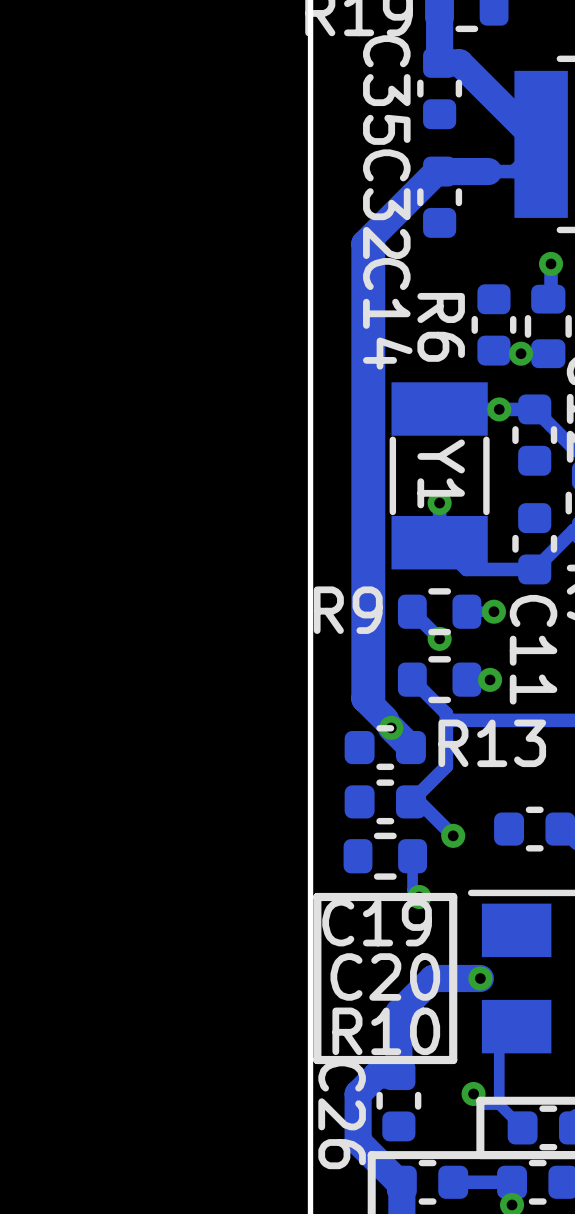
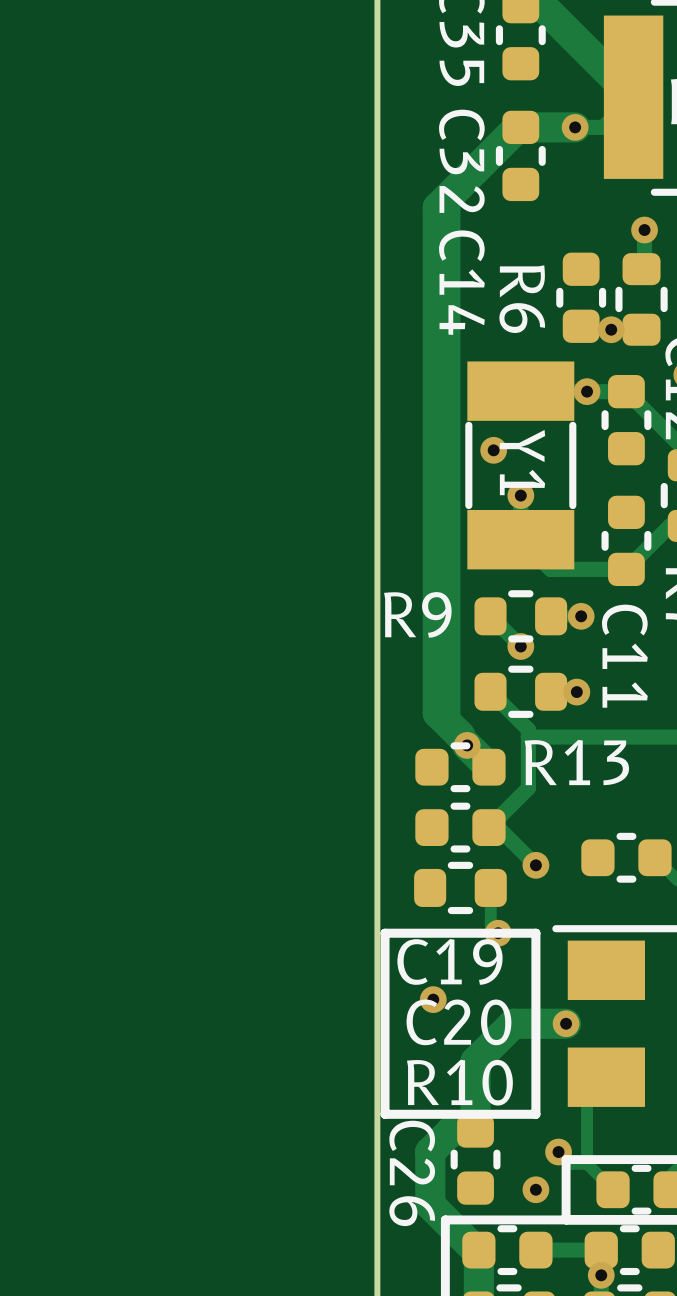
via: none -> (575, 127)
via: none -> (493, 450)
via: none -> (433, 999)
via: none -> (535, 1189)

